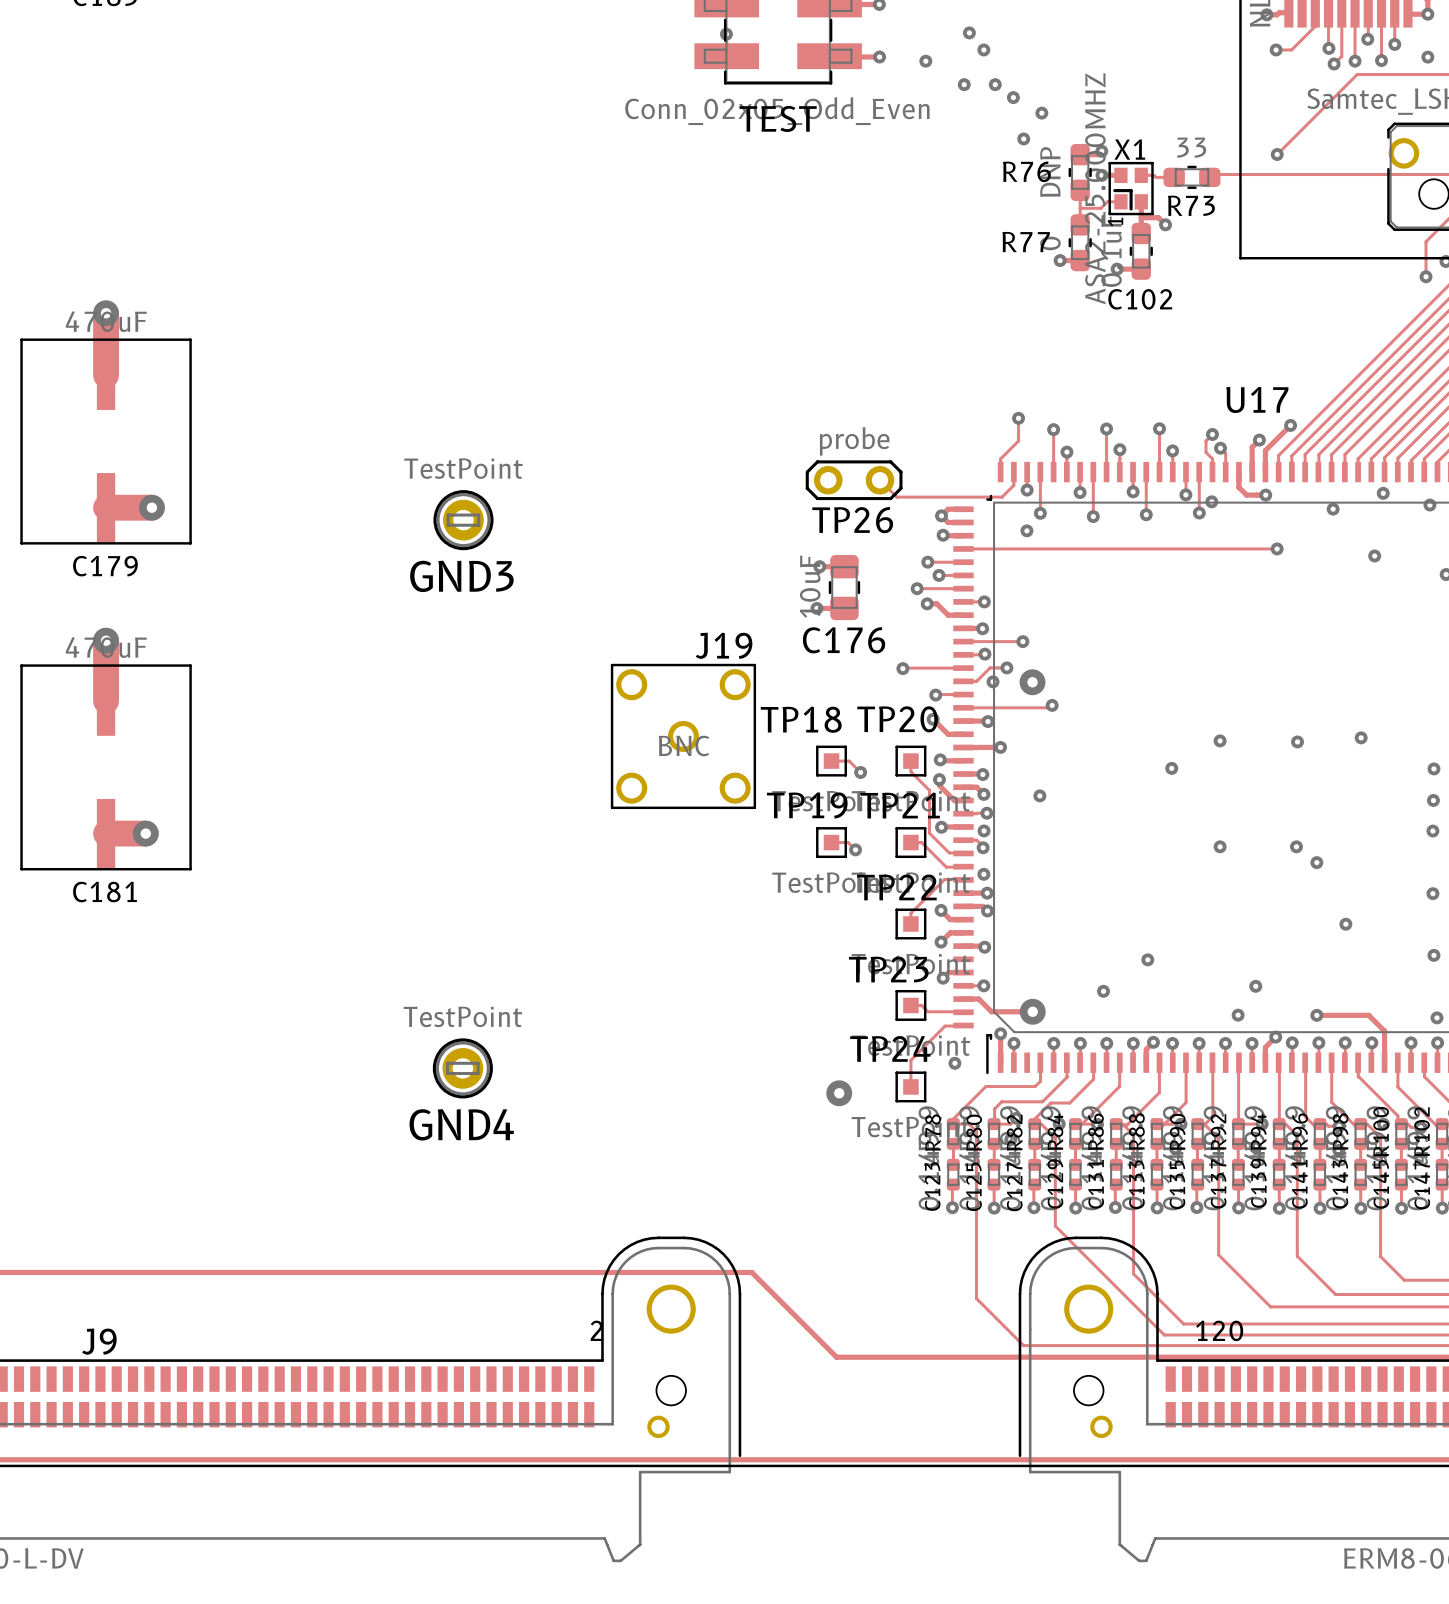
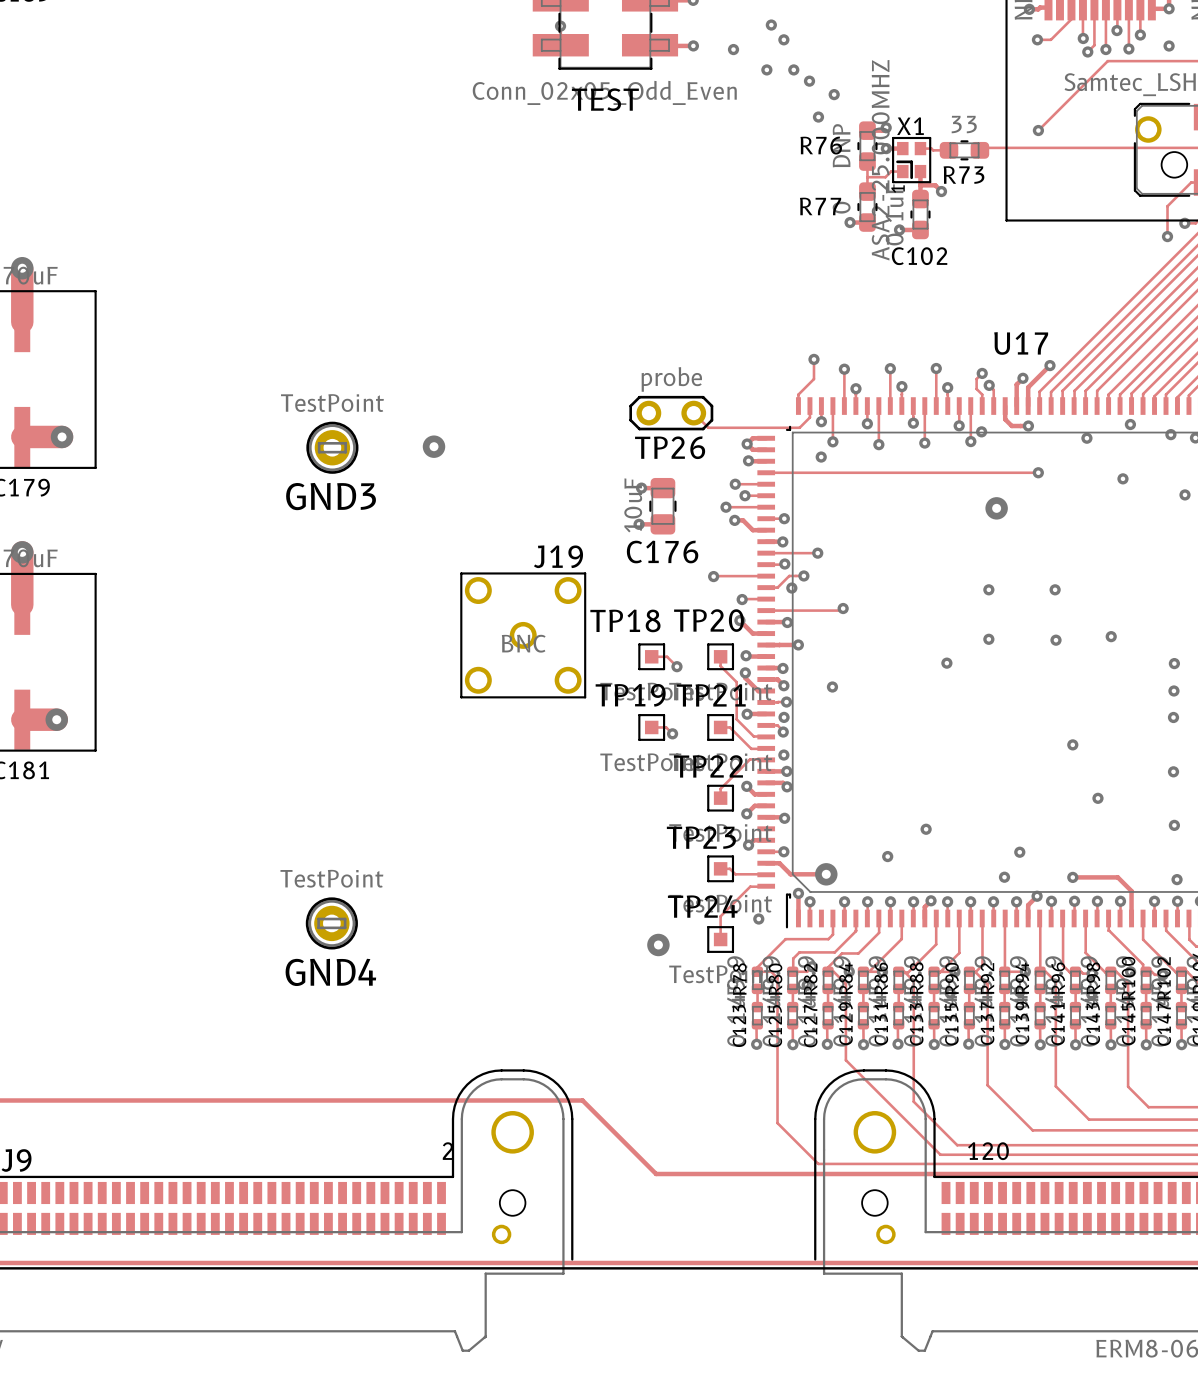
via: none -> (434, 446)
via: none -> (996, 508)
via: (1032, 682) -> none
via: none -> (988, 589)
via: none -> (1055, 589)
via: (1220, 846) -> none
via: (1296, 846) -> none

